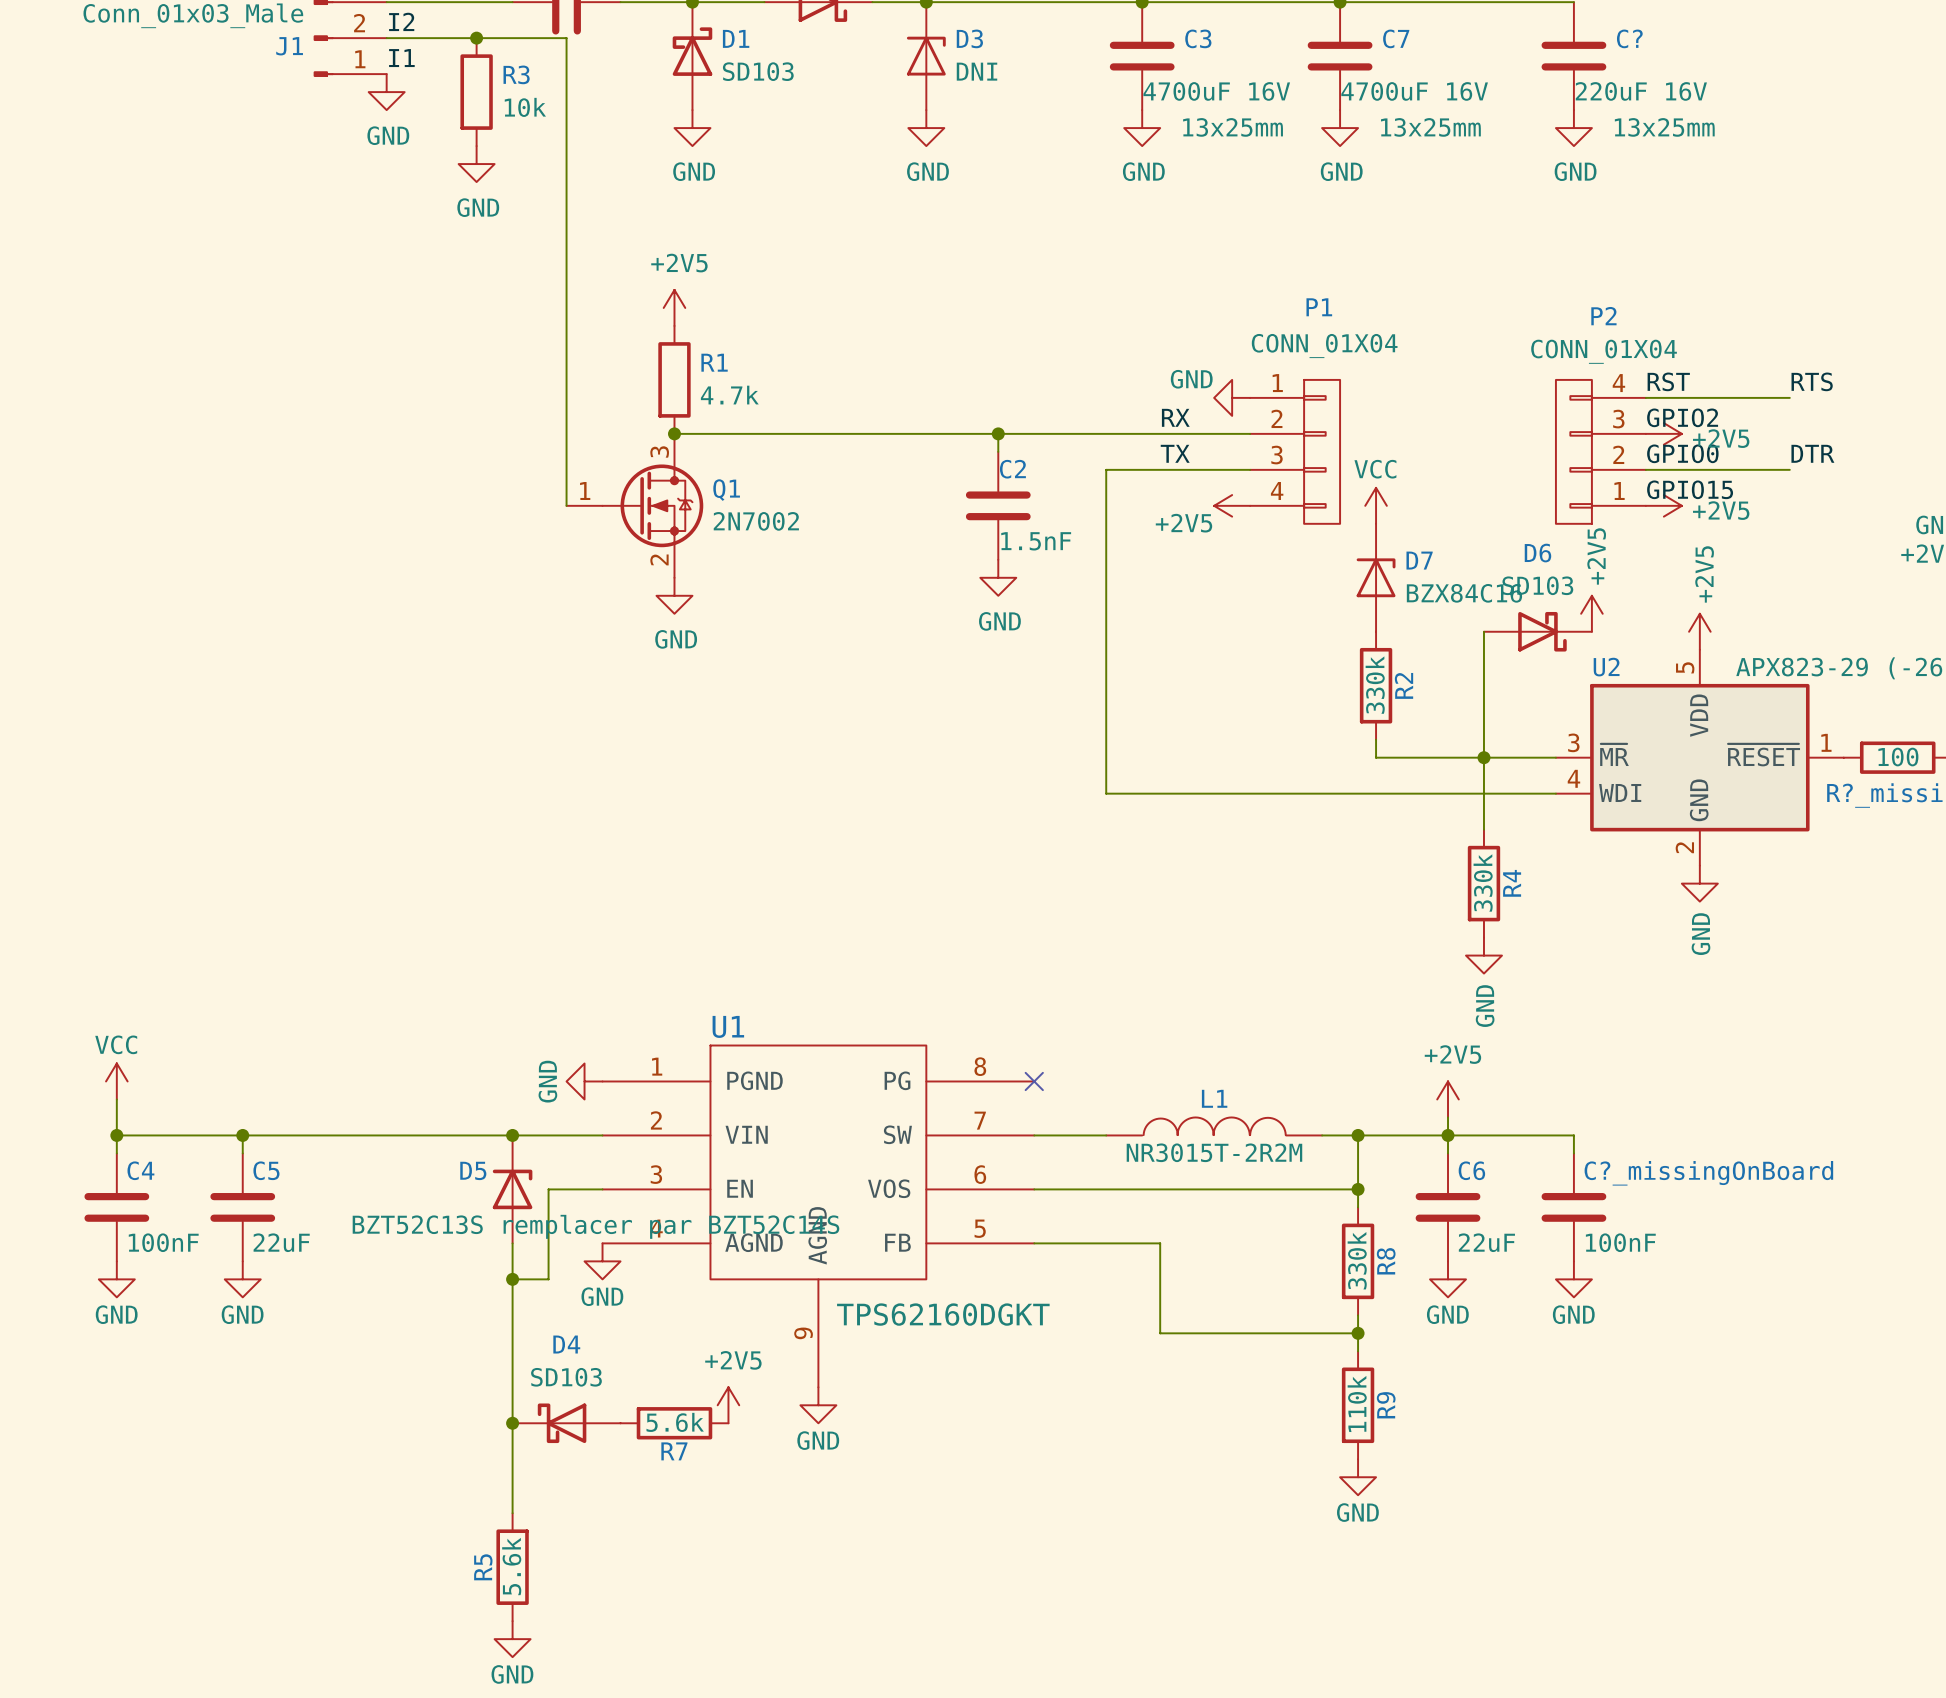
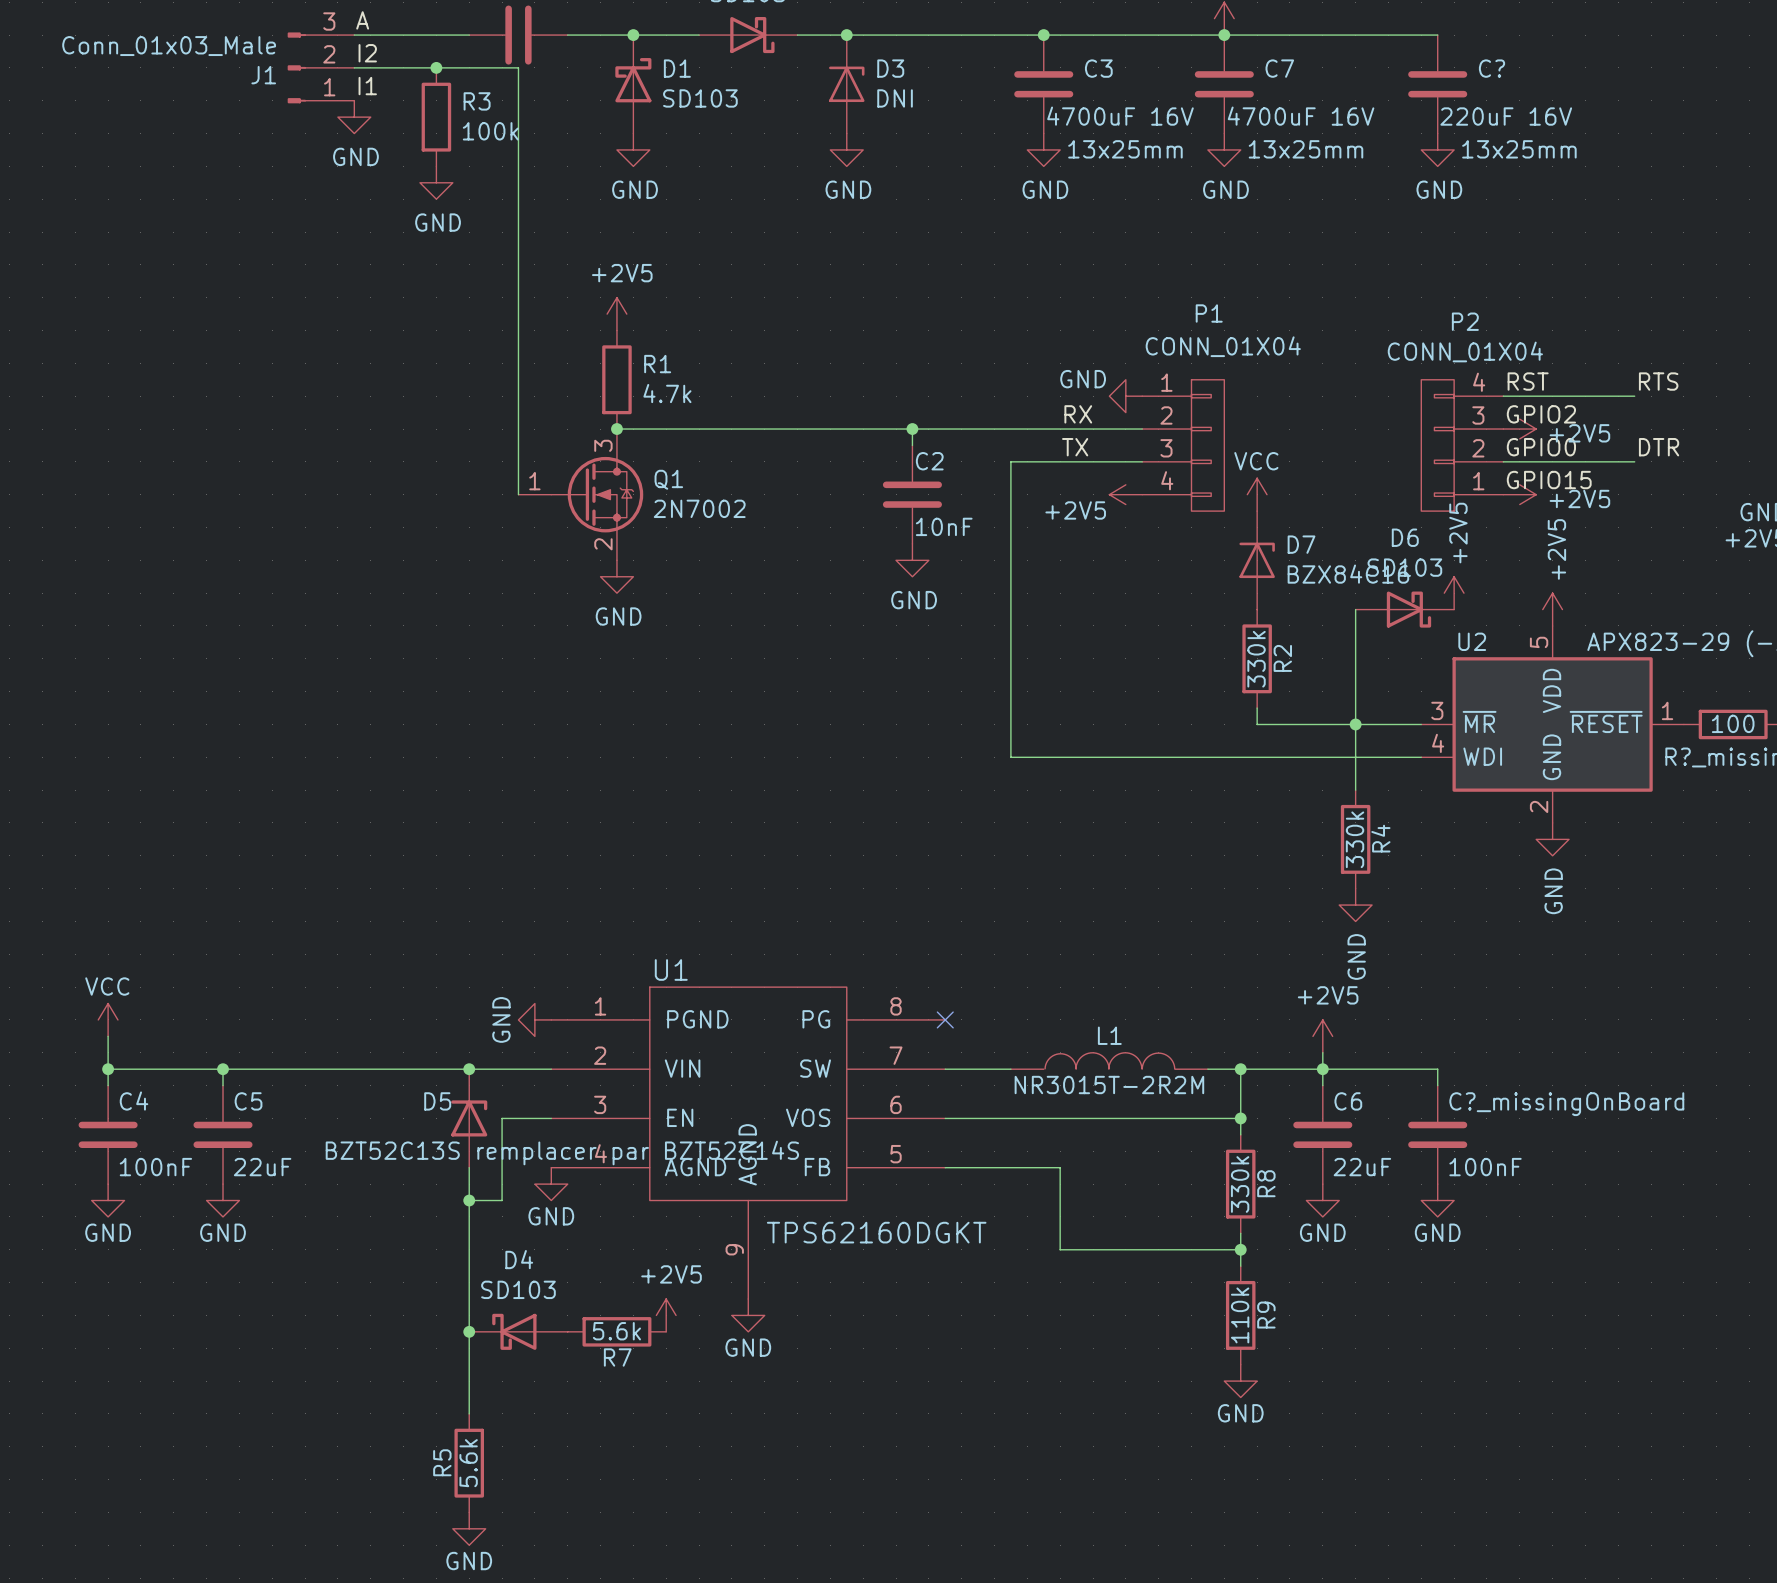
R3 value: 10k (525, 107) -> 100k (490, 131)
C2 value: 1.5nF (1036, 541) -> 10nF (944, 526)

